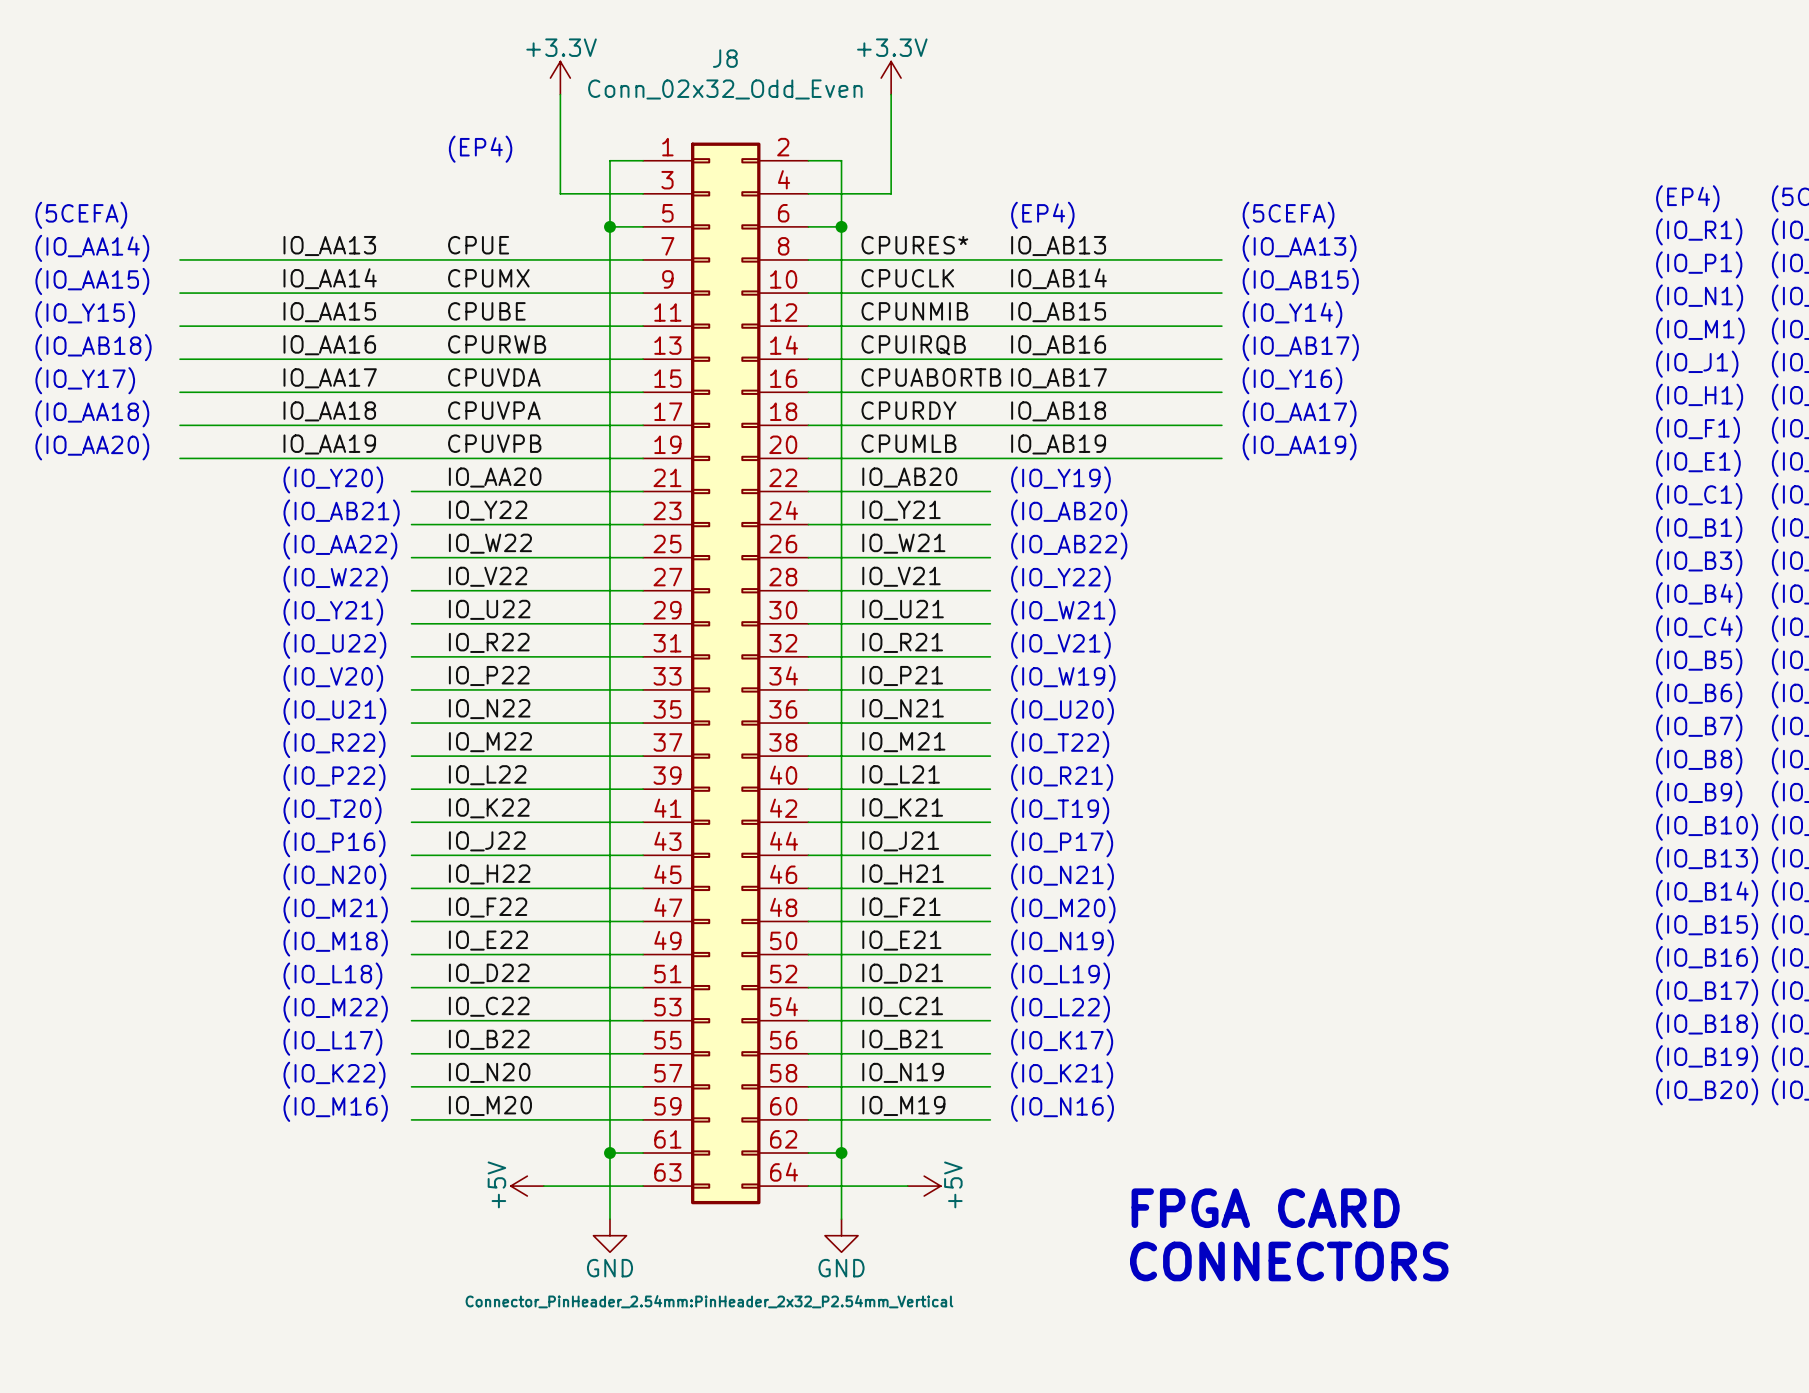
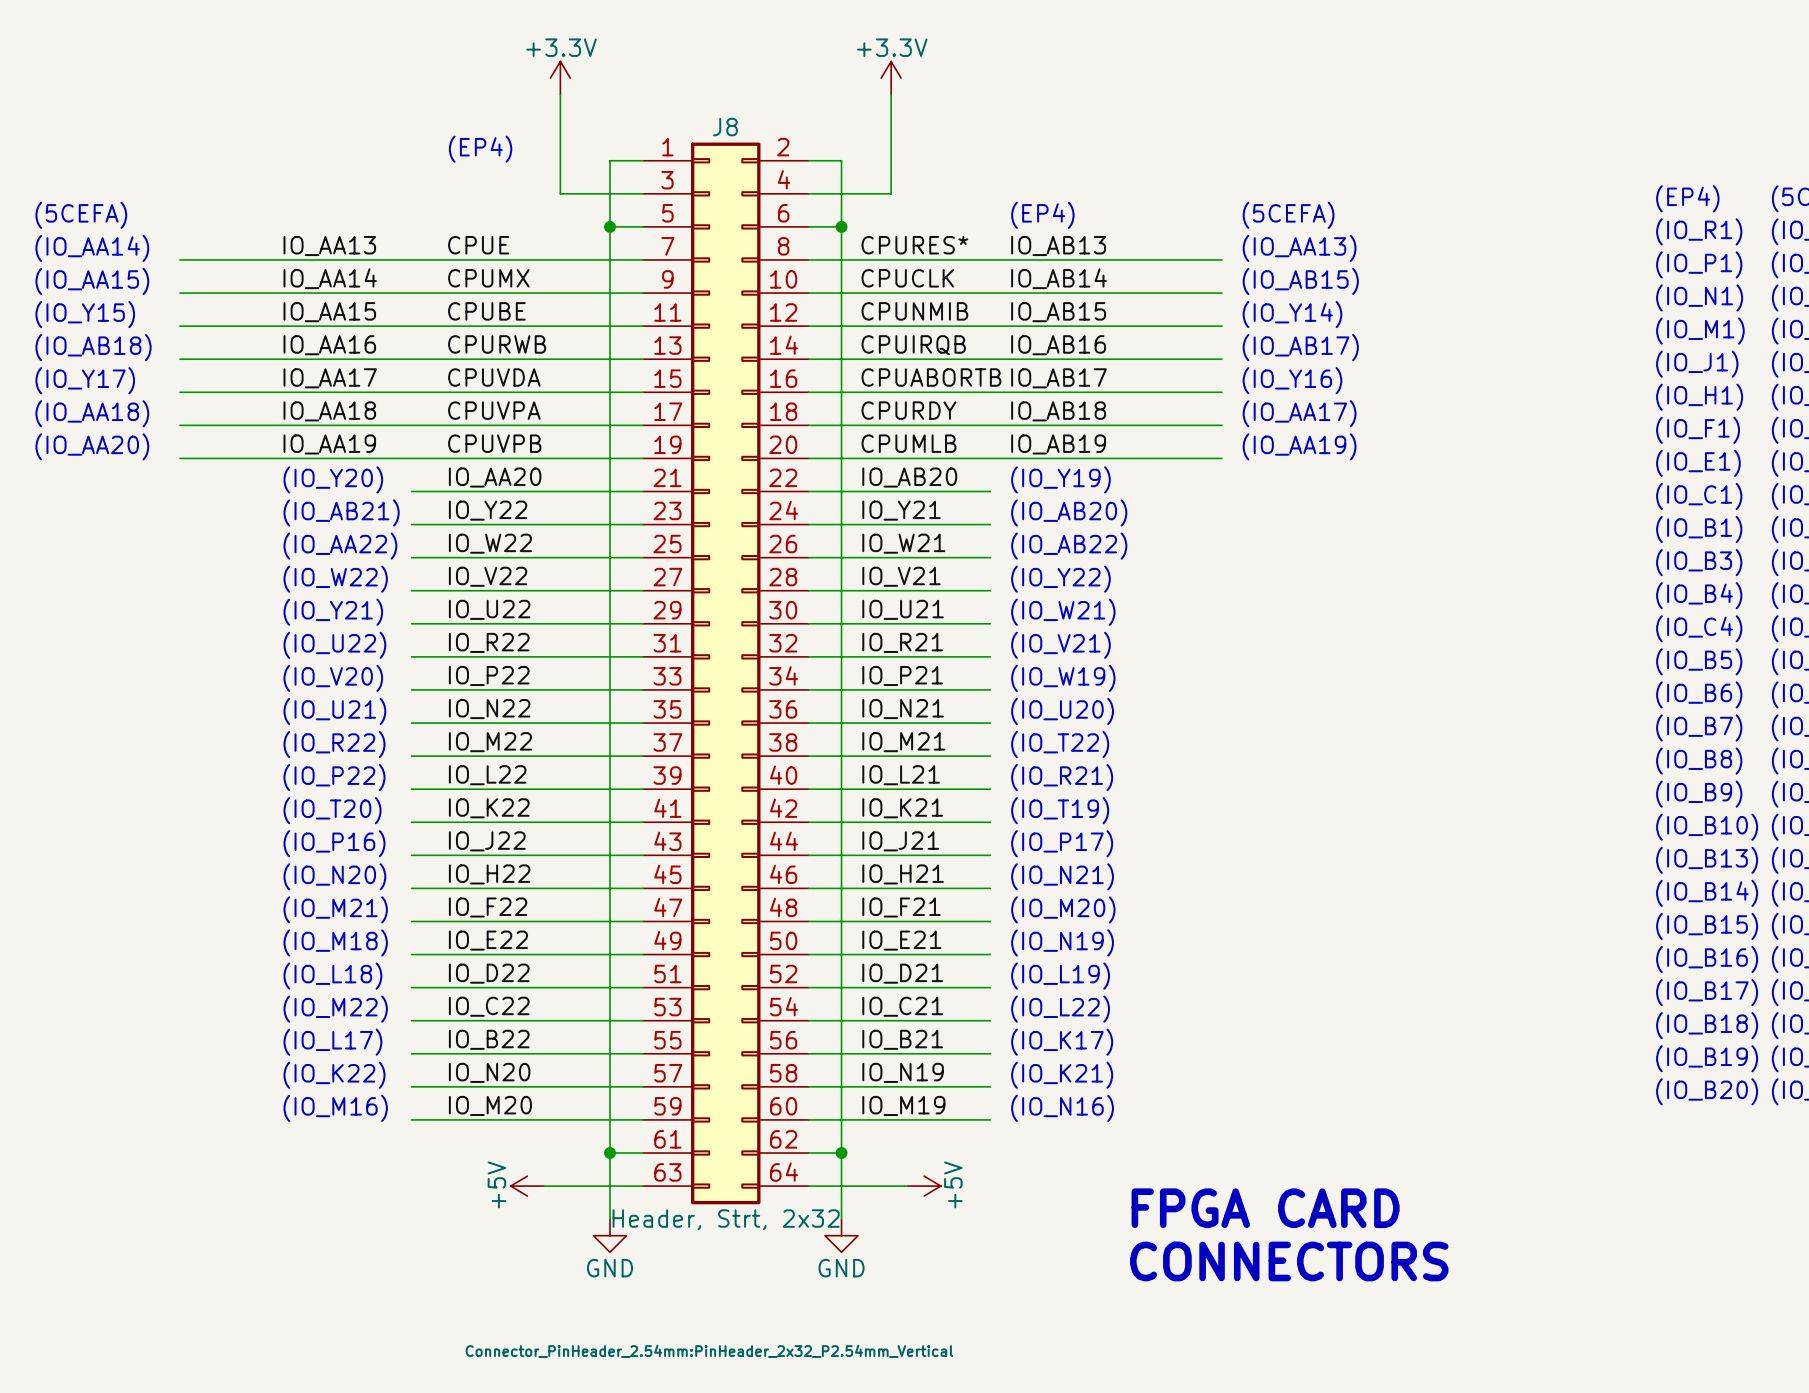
J8 name position: J8 (725, 58) -> J8 (725, 127)
J8 value: Conn_02x32_Odd_Even (725, 89) -> Header, Strt, 2x32 (726, 1219)
J8 text position: Connector_PinHeader_2.54mm:PinHeader_2x32_P2.54mm_Vertical (709, 1301) -> Connector_PinHeader_2.54mm:PinHeader_2x32_P2.54mm_Vertical (709, 1351)

